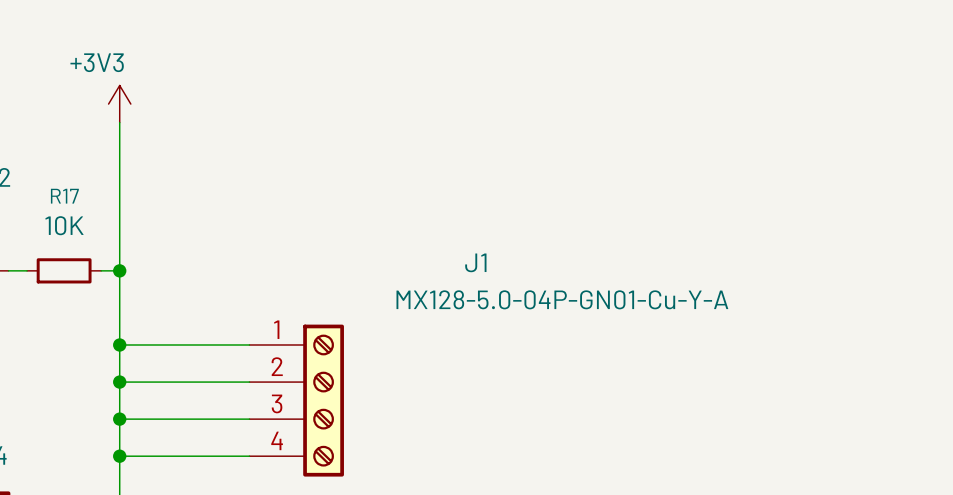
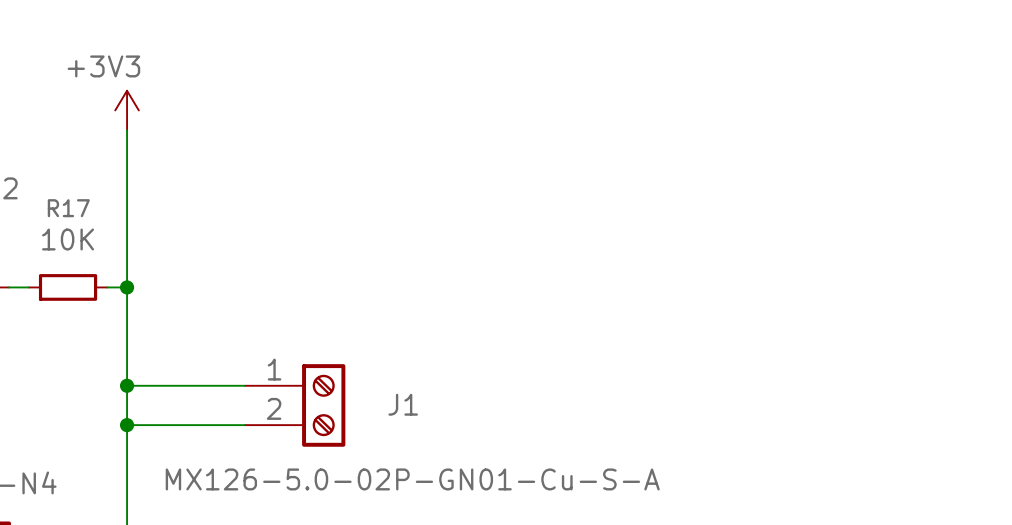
J1 name position: J1 (475, 262) -> J1 (403, 404)
J1 value: MX128-5.0-04P-GN01-Cu-Y-A (562, 299) -> MX126-5.0-02P-GN01-Cu-S-A (412, 479)
J1 symbol: [249, 324, 344, 477] -> [245, 364, 346, 447]
wire: (119, 344) (249, 344) -> none
junction: (119, 344) -> none
wire: none -> (127, 385) (245, 385)
junction: none -> (127, 385)
wire: (119, 382) (249, 382) -> none
junction: (119, 382) -> none
wire: none -> (127, 425) (245, 425)
junction: none -> (127, 425)
wire: (119, 419) (249, 419) -> none
junction: (119, 419) -> none
wire: (119, 456) (249, 456) -> none
junction: (119, 456) -> none

